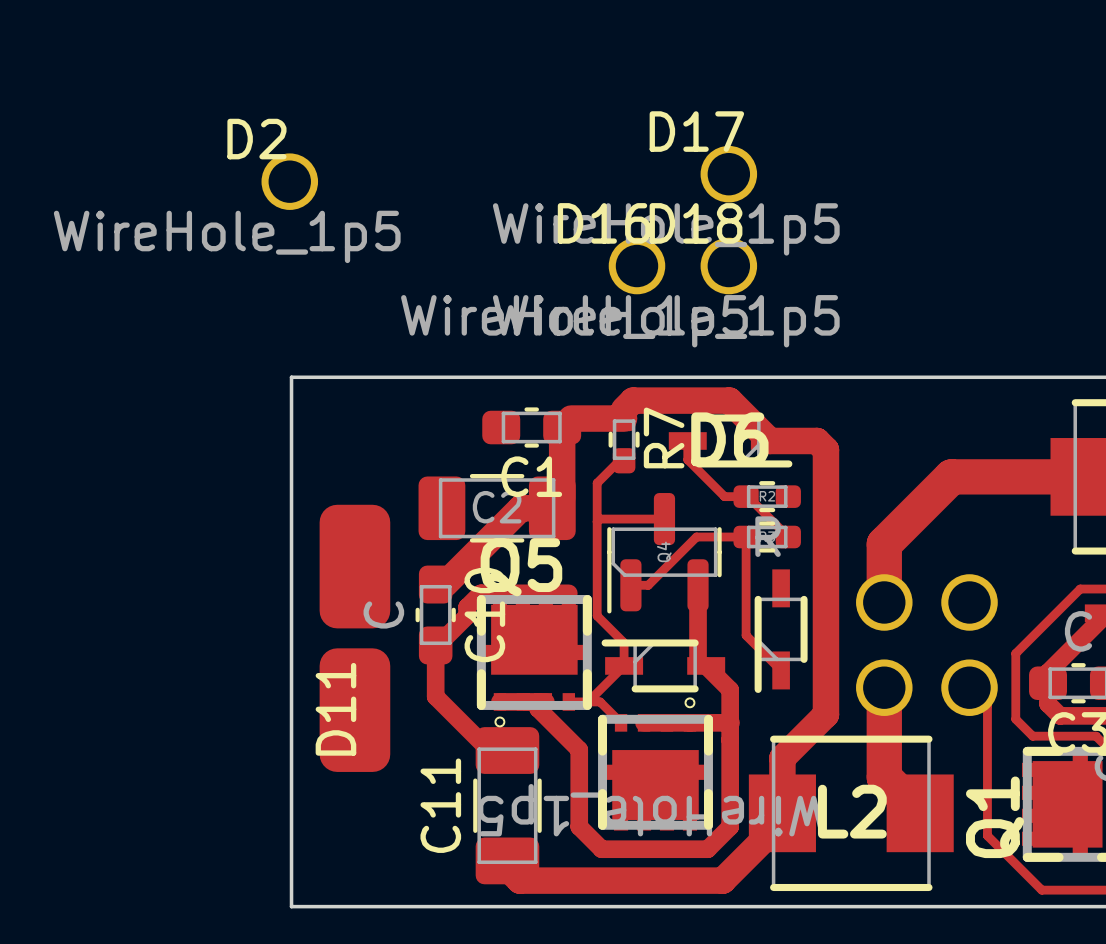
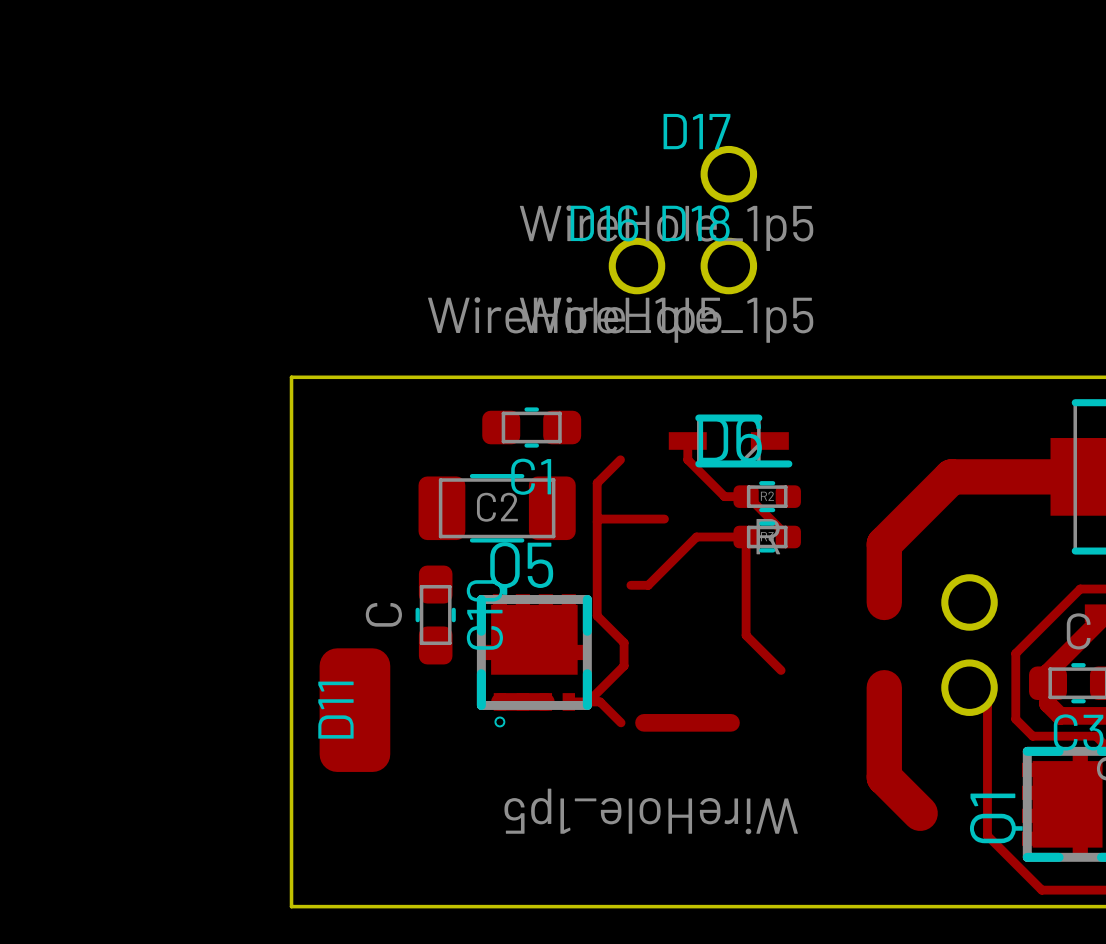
D2: WireHole_1p5 (289, 181) -> none
R7: (624, 439) -> none
Q4: (664, 553) -> none
part: (354, 566) -> none
track: (435, 584) (444, 584) (520, 508) (552, 508) (562, 498) (562, 427) (571, 418) (624, 418) (624, 409) (633, 400) (729, 400) (769, 440) (816, 440) (825, 449) (825, 714) (782, 758) (782, 813) (767, 828) (767, 835) (722, 880) (519, 880) (500, 860) -> none
track: (698, 585) (698, 657) (730, 689) (730, 826) (707, 849) (601, 849) (579, 826) (579, 749) (538, 708) (538, 701) -> none
track: (568, 593) (480, 593) (467, 607) (467, 615) (435, 645) (435, 696) (489, 750) (507, 750) -> none
part: (884, 602) -> none
part: (781, 631) -> none
part: (663, 665) -> none
part: (884, 687) -> none
part: (655, 763) -> none
C11: (507, 805) -> none
L2: (851, 813) -> none

